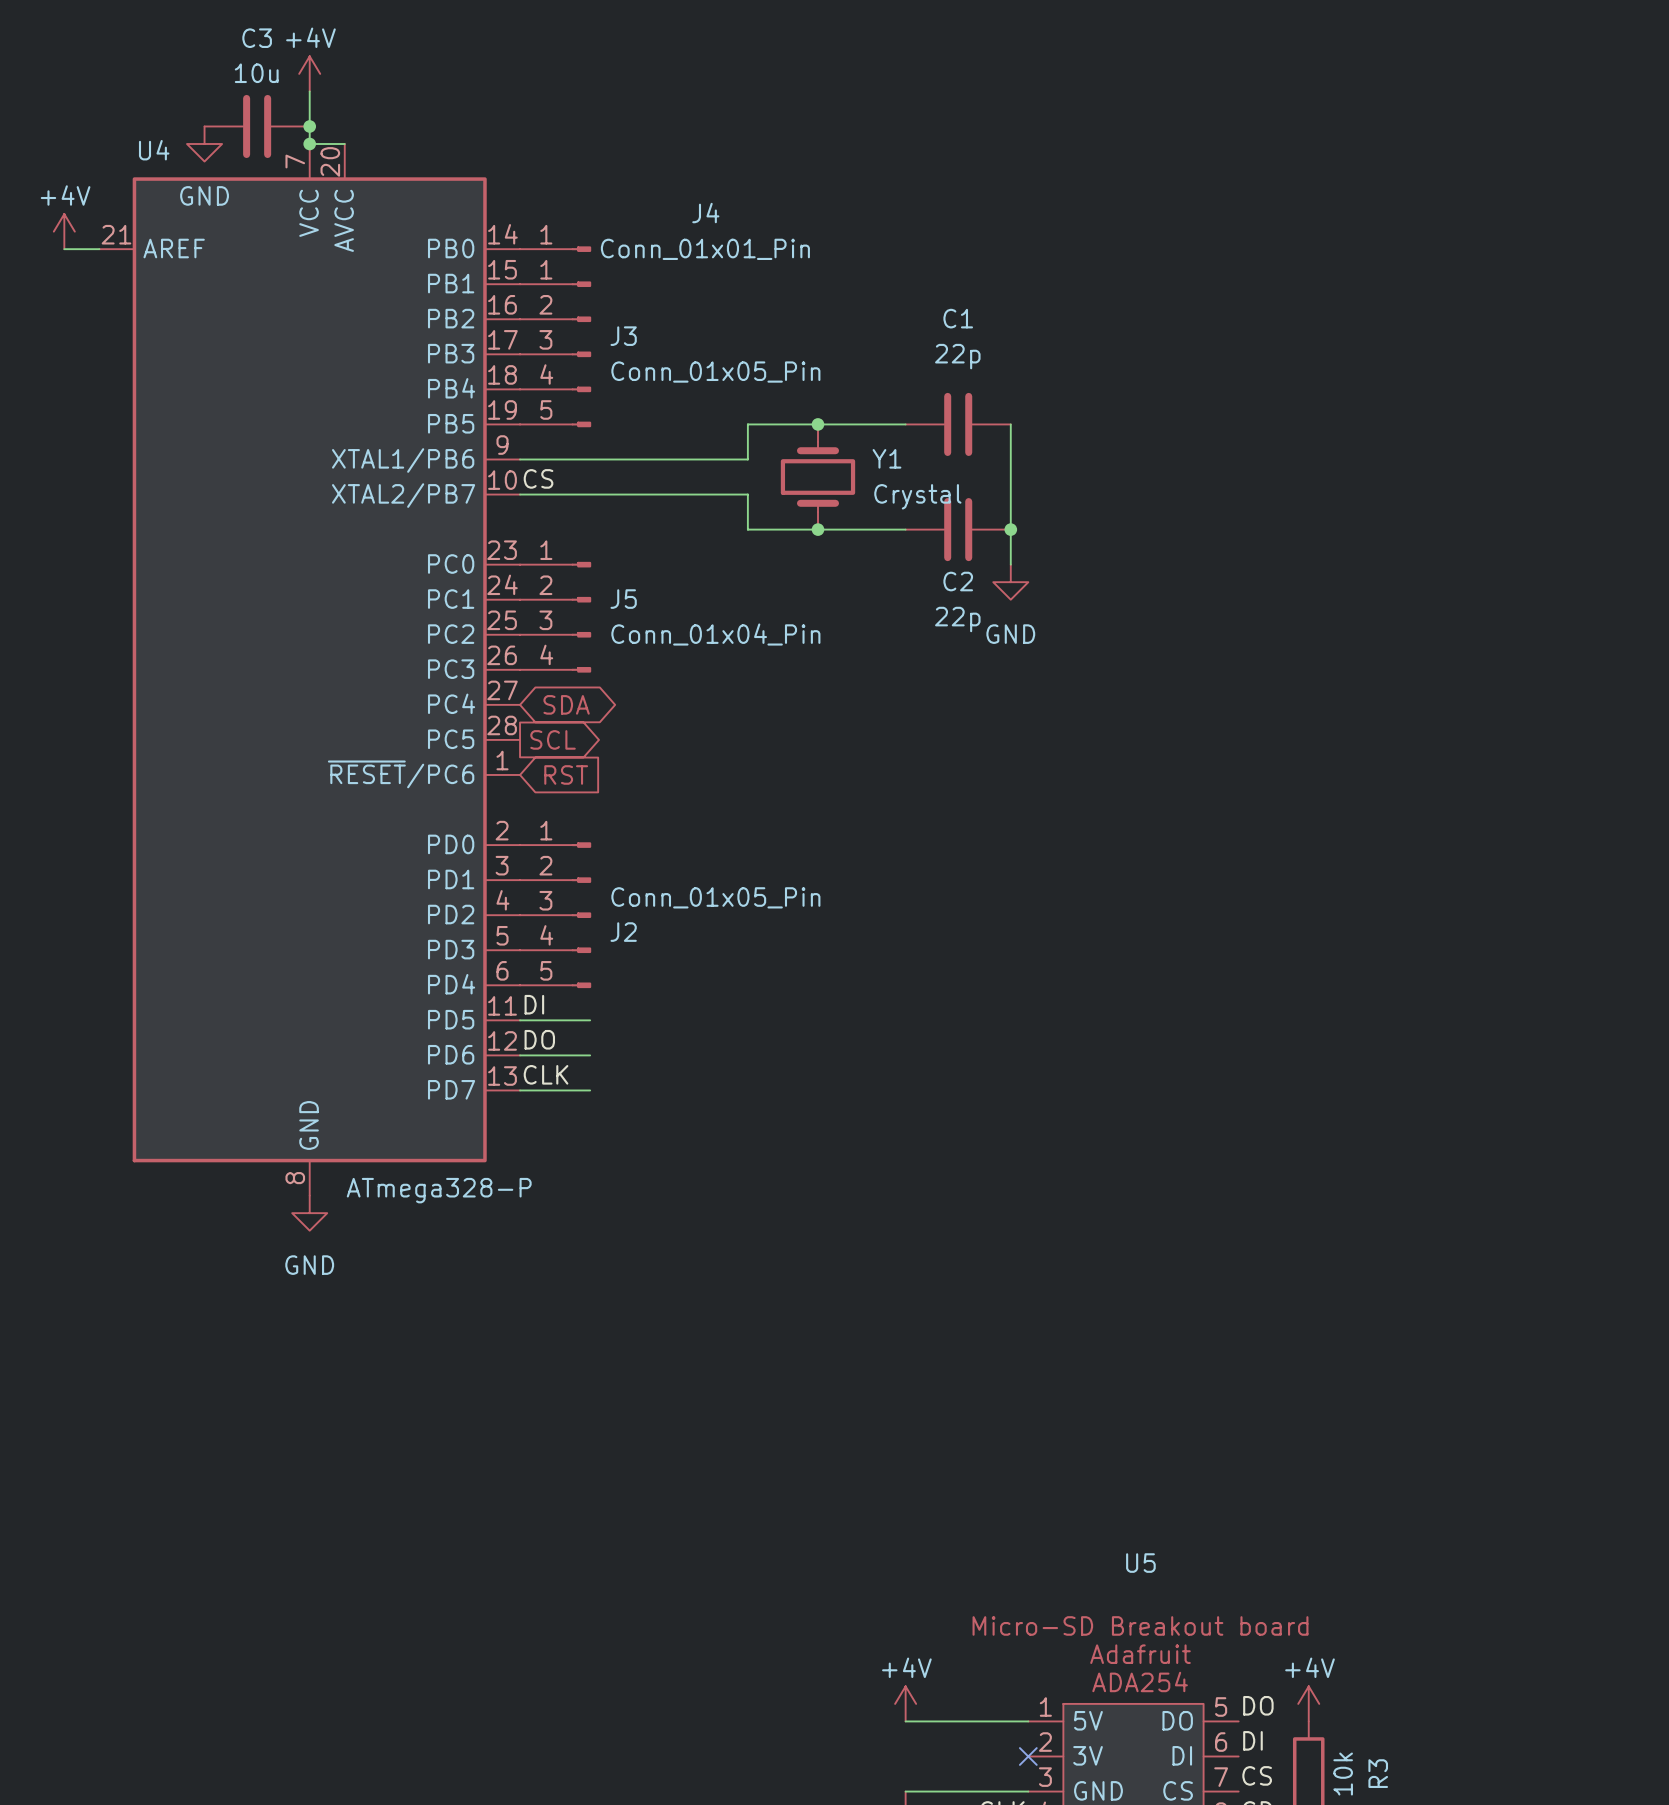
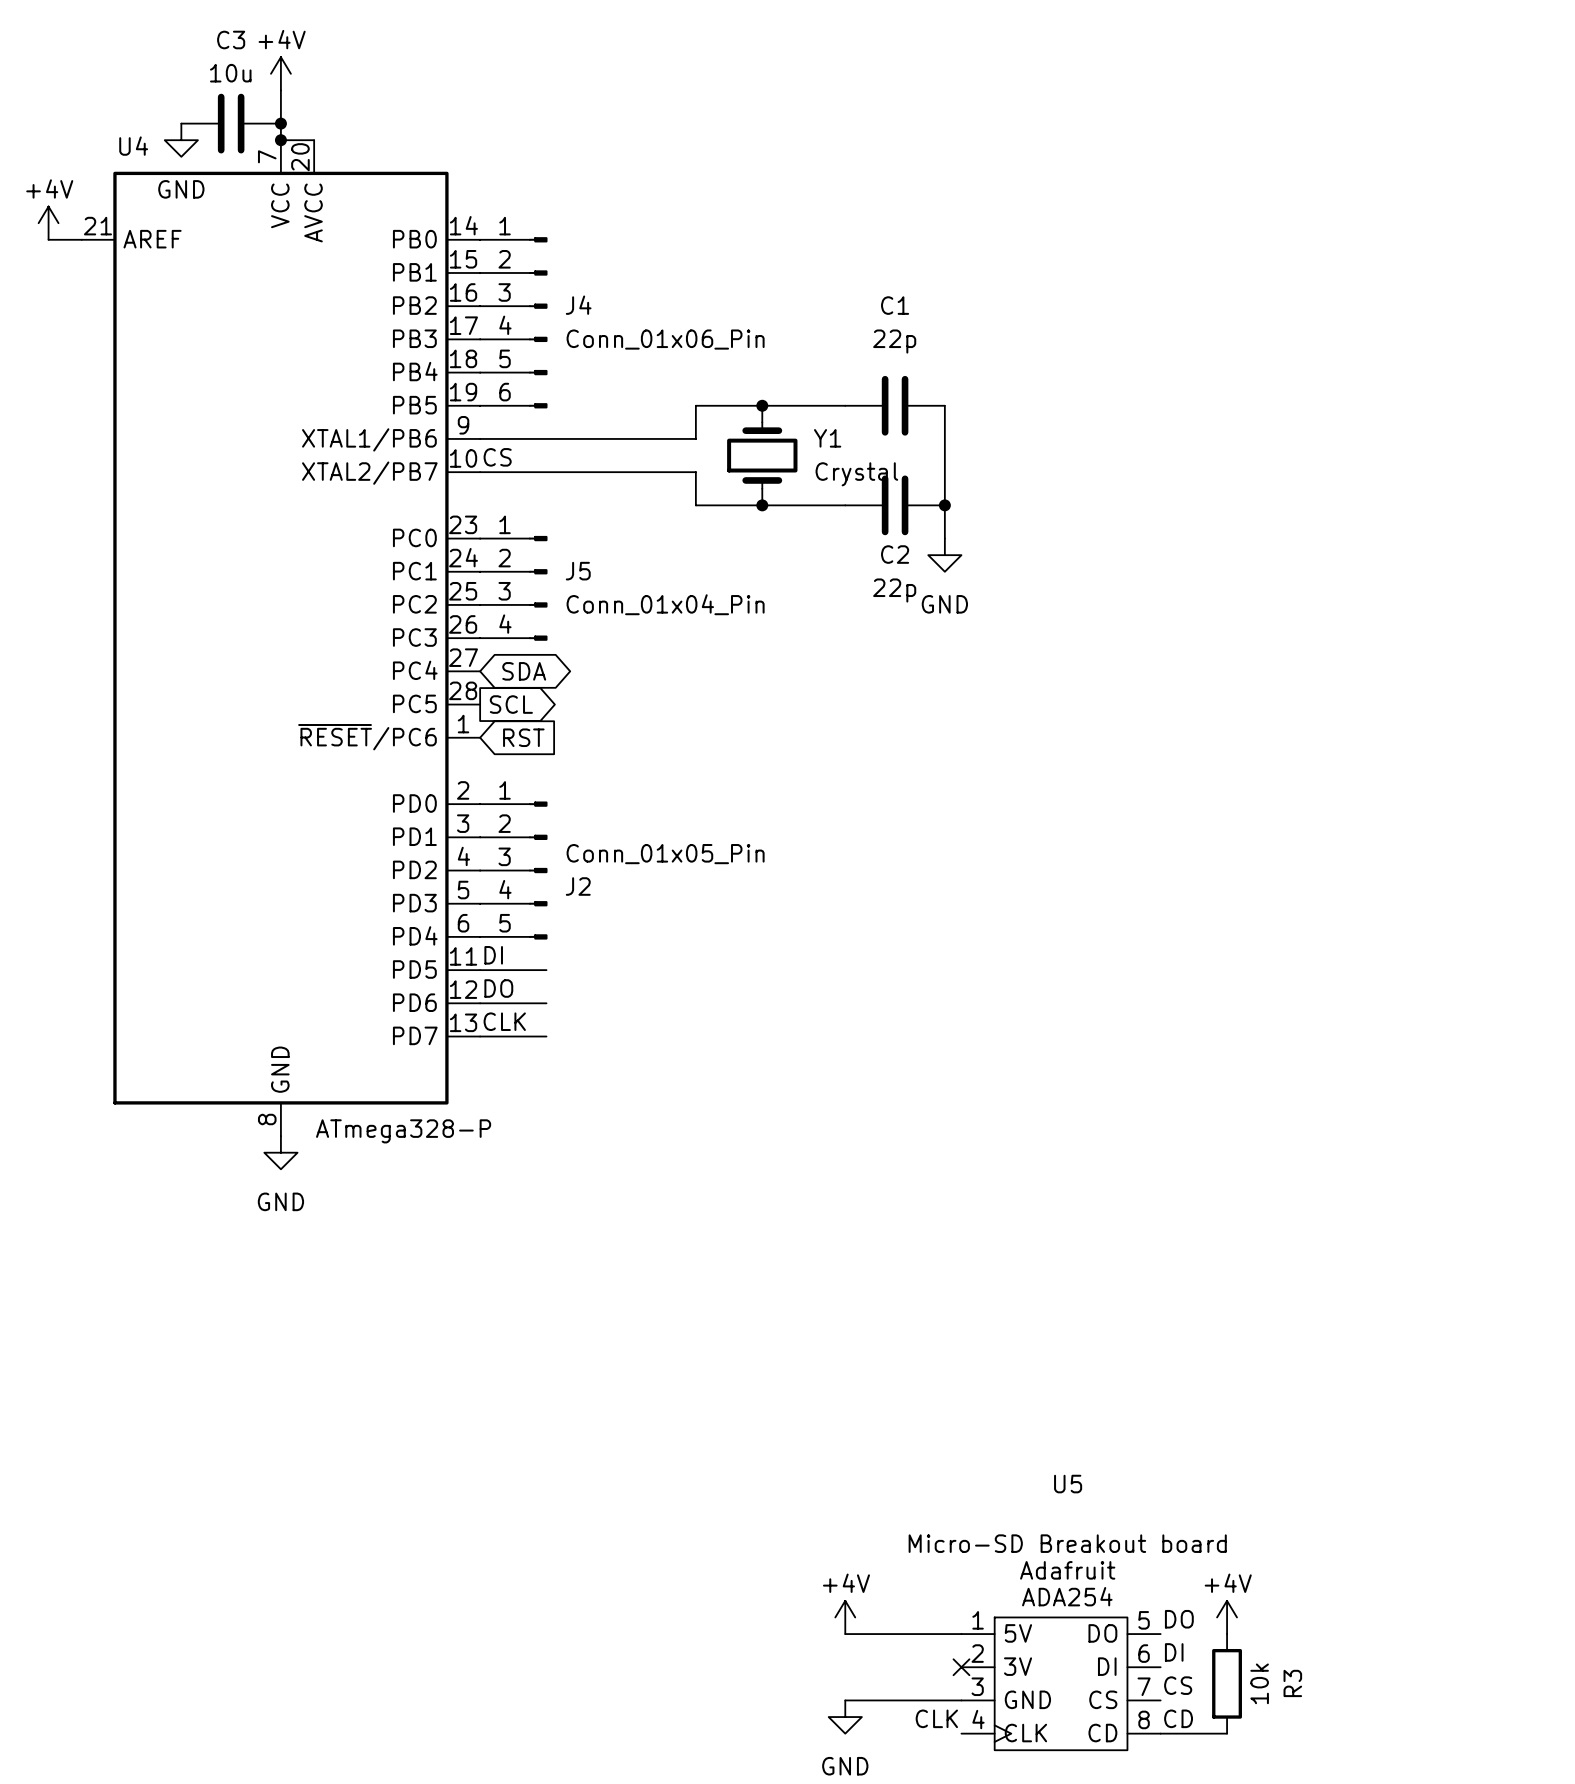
J4 name position: J4 (705, 213) -> J4 (578, 305)
J4 symbol: [520, 246, 592, 252] -> [480, 237, 548, 409]
J4 value: Conn_01x01_Pin (705, 249) -> Conn_01x06_Pin (665, 339)
J3: Conn_01x05_Pin (555, 354) -> none

